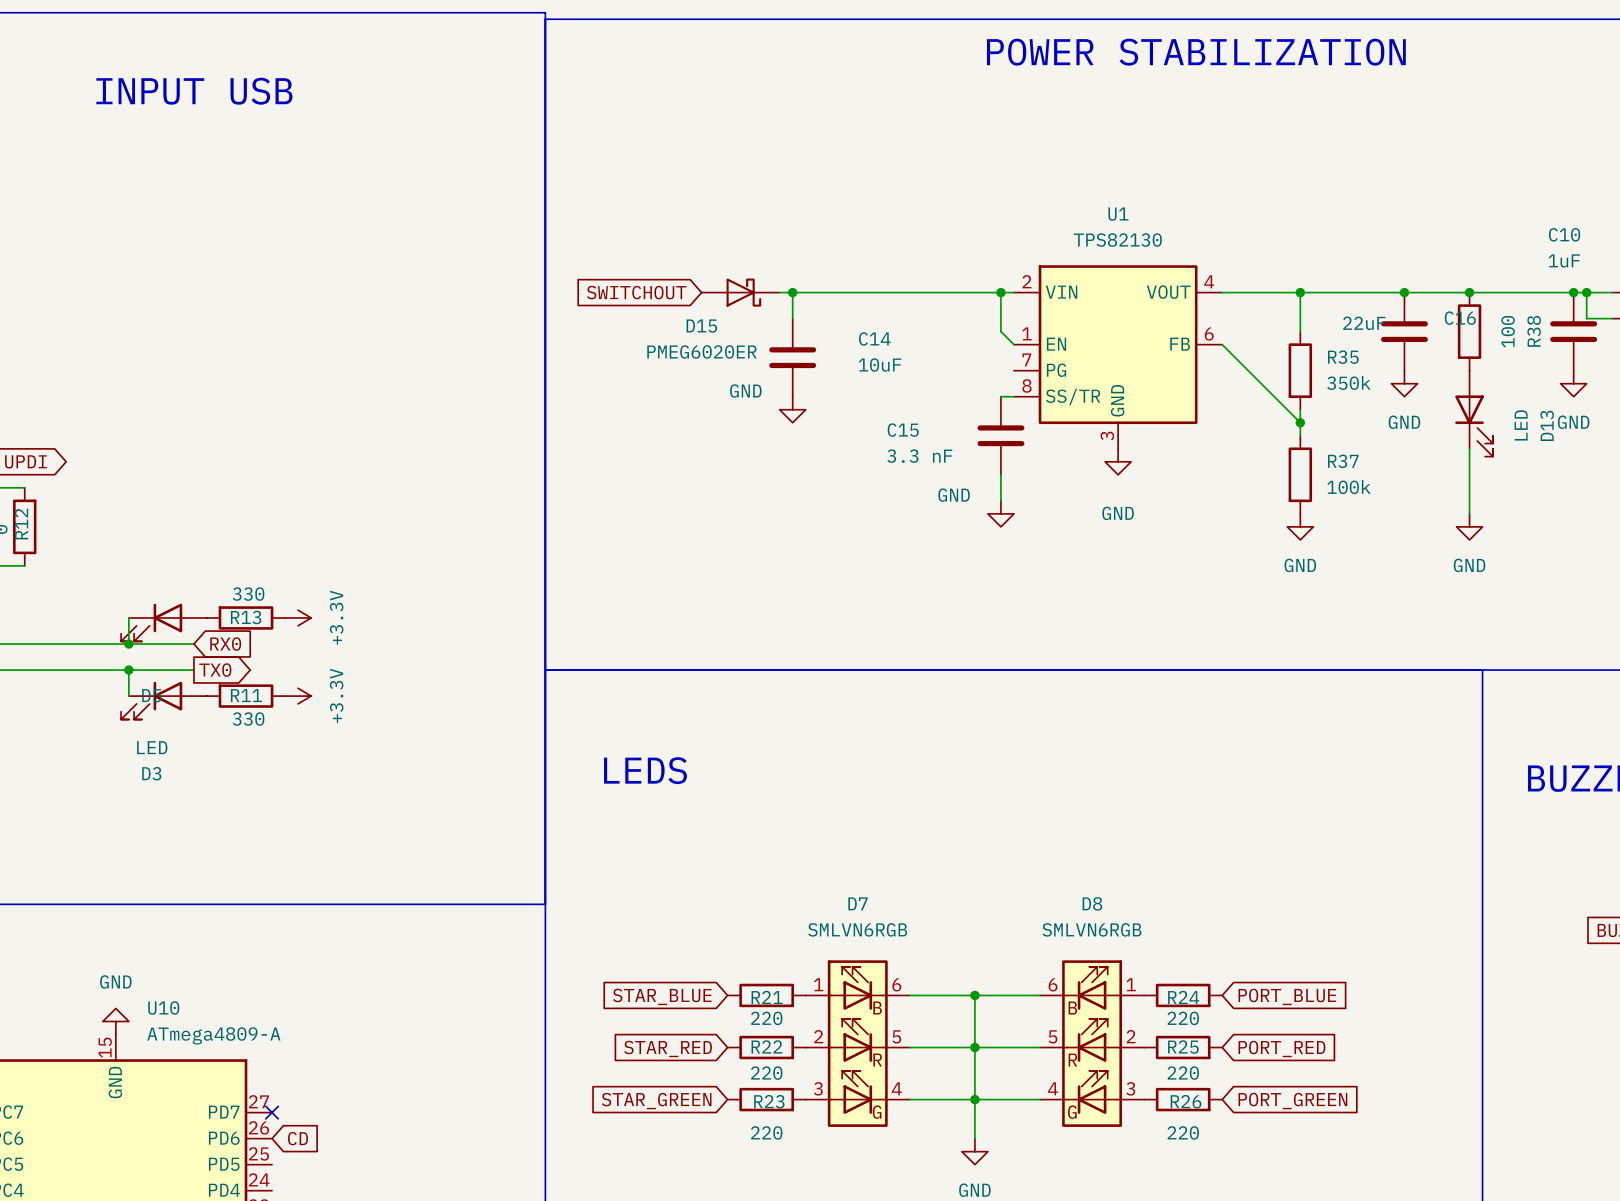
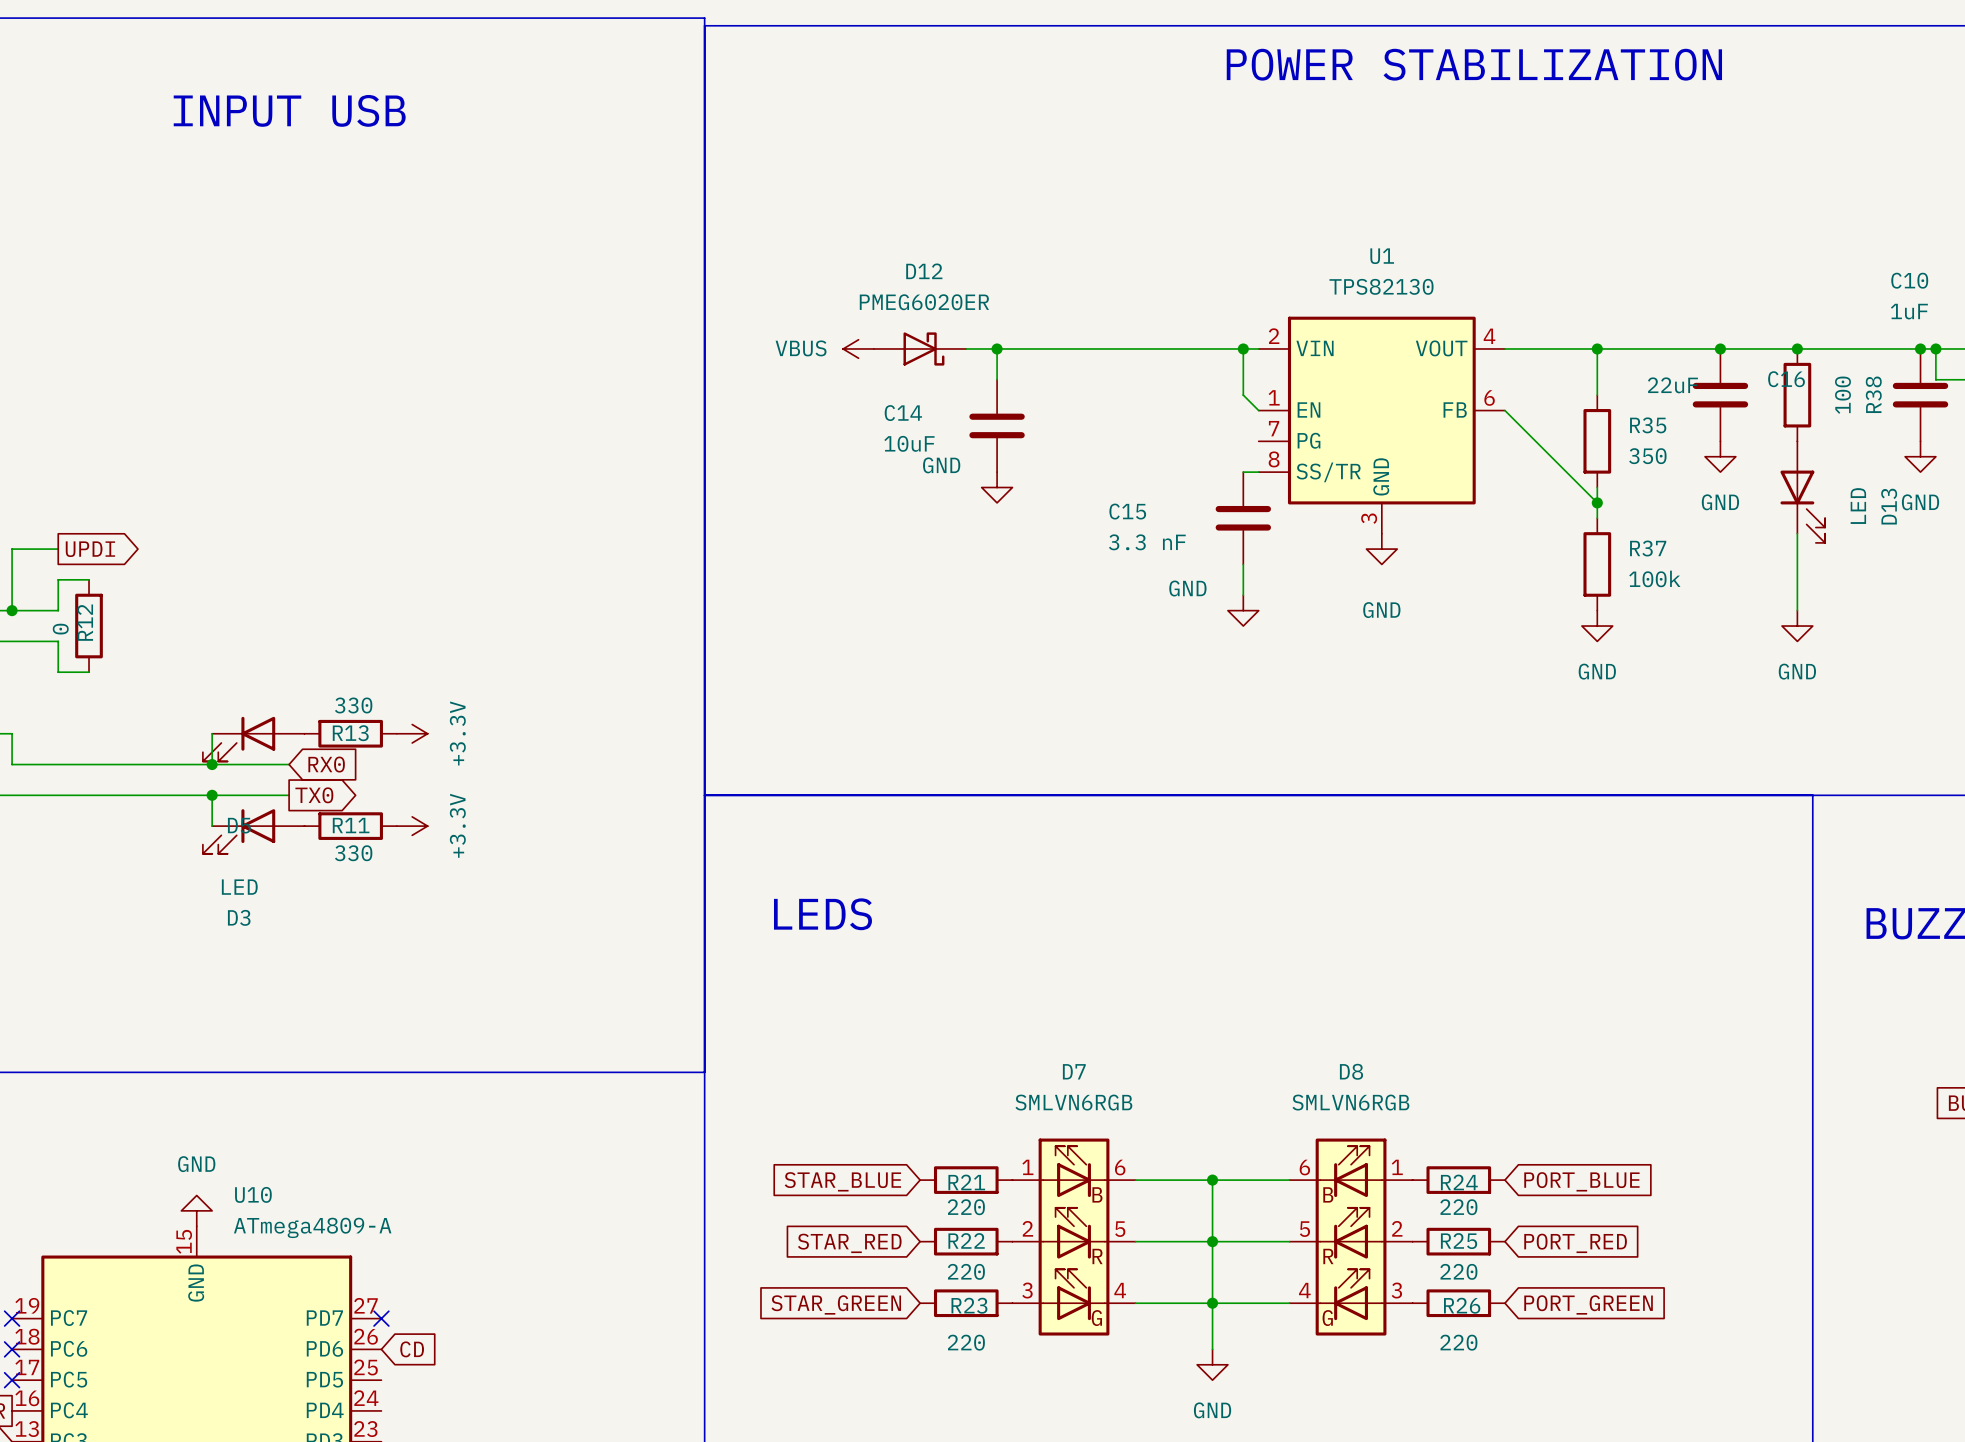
global label: SWITCHOUT (636, 292) -> none
power symbol: none -> VBUS (858, 348)
D12: none -> PMEG6020ER (920, 348)
D15: PMEG6020ER (740, 292) -> none
C14 name position: C14 (874, 338) -> C14 (903, 413)
C14 value position: 10uF (879, 364) -> 10uF (909, 443)
R35 value: 350k (1348, 382) -> 350 (1647, 456)

